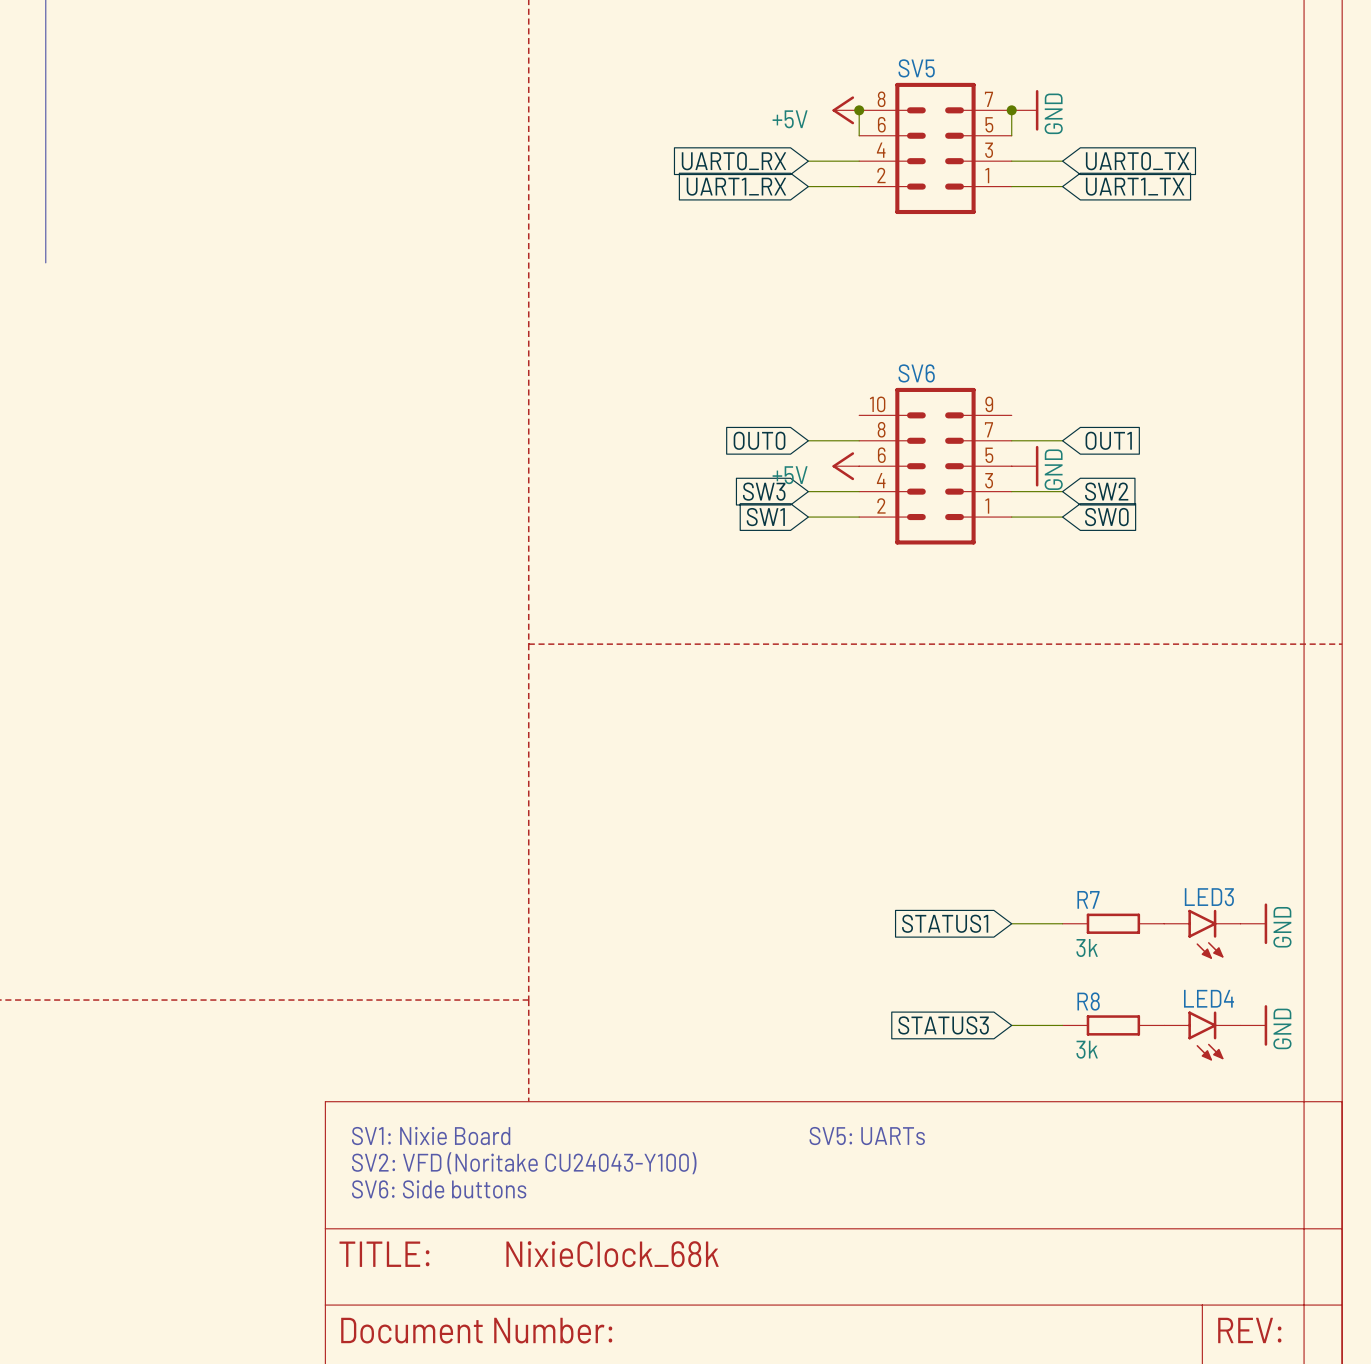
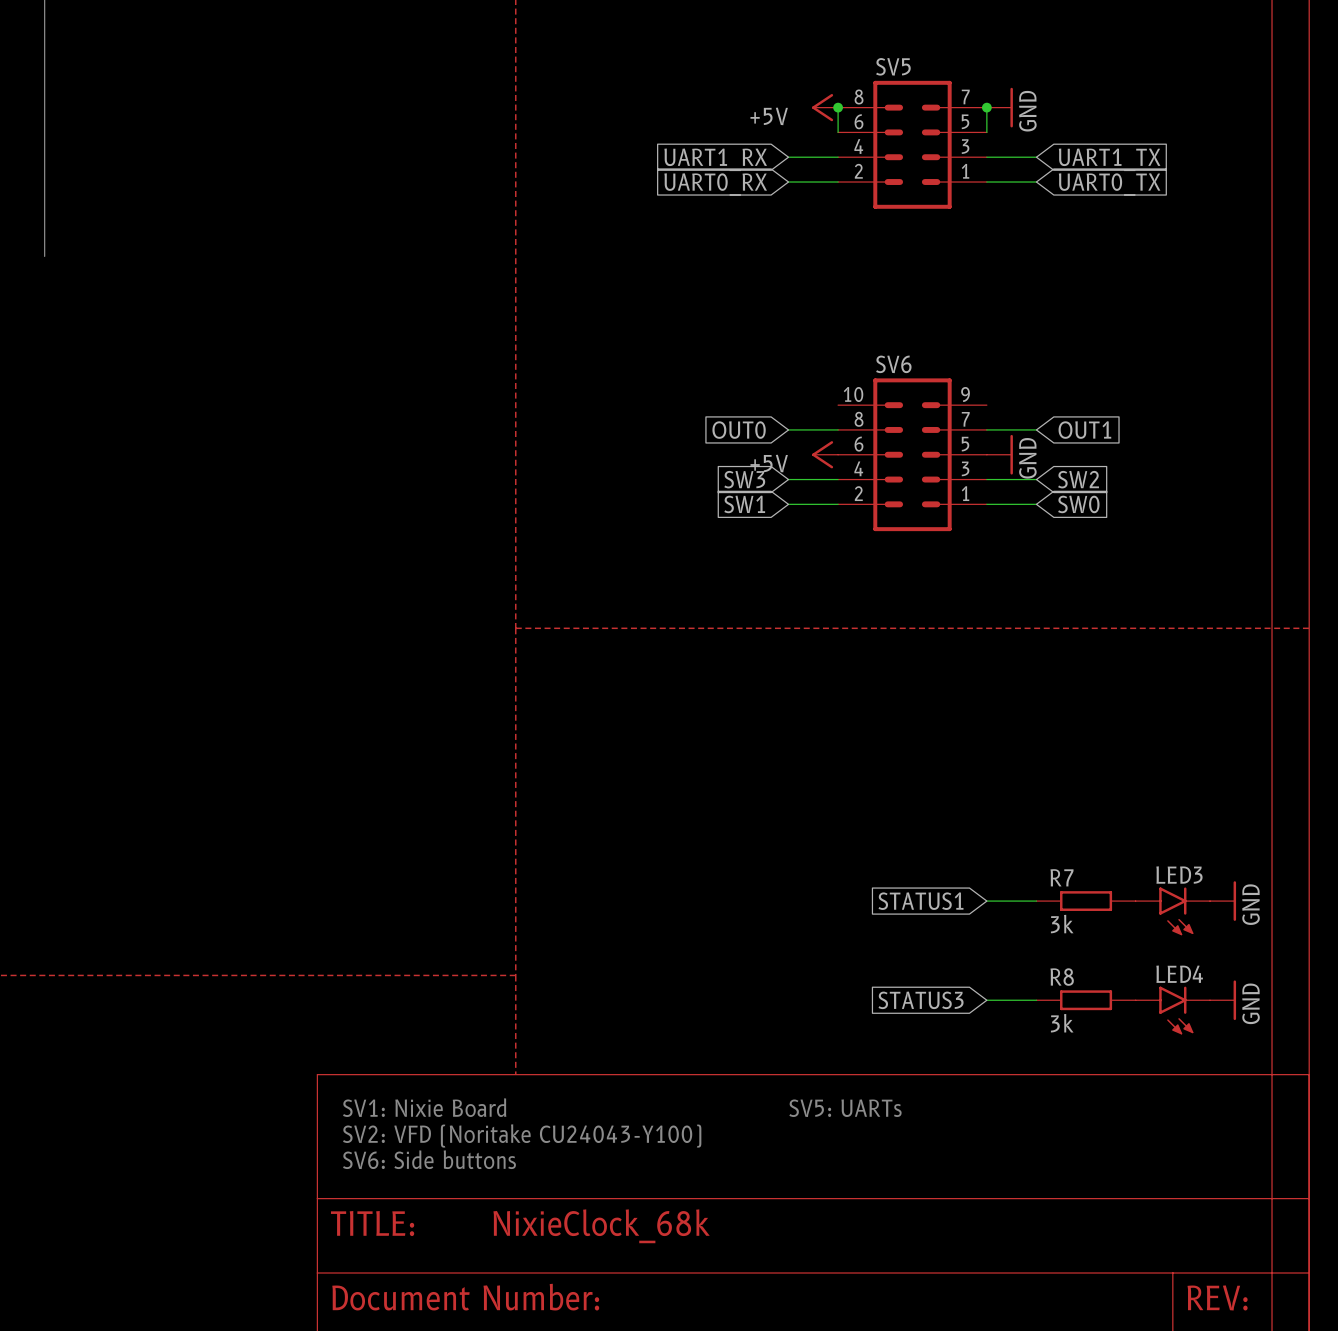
global label: UART0_RX (733, 161) -> UART1_RX (715, 159)
global label: UART0_TX (1137, 161) -> UART1_TX (1109, 159)
global label: UART1_RX (736, 186) -> UART0_RX (715, 184)
global label: UART1_TX (1135, 186) -> UART0_TX (1109, 184)

